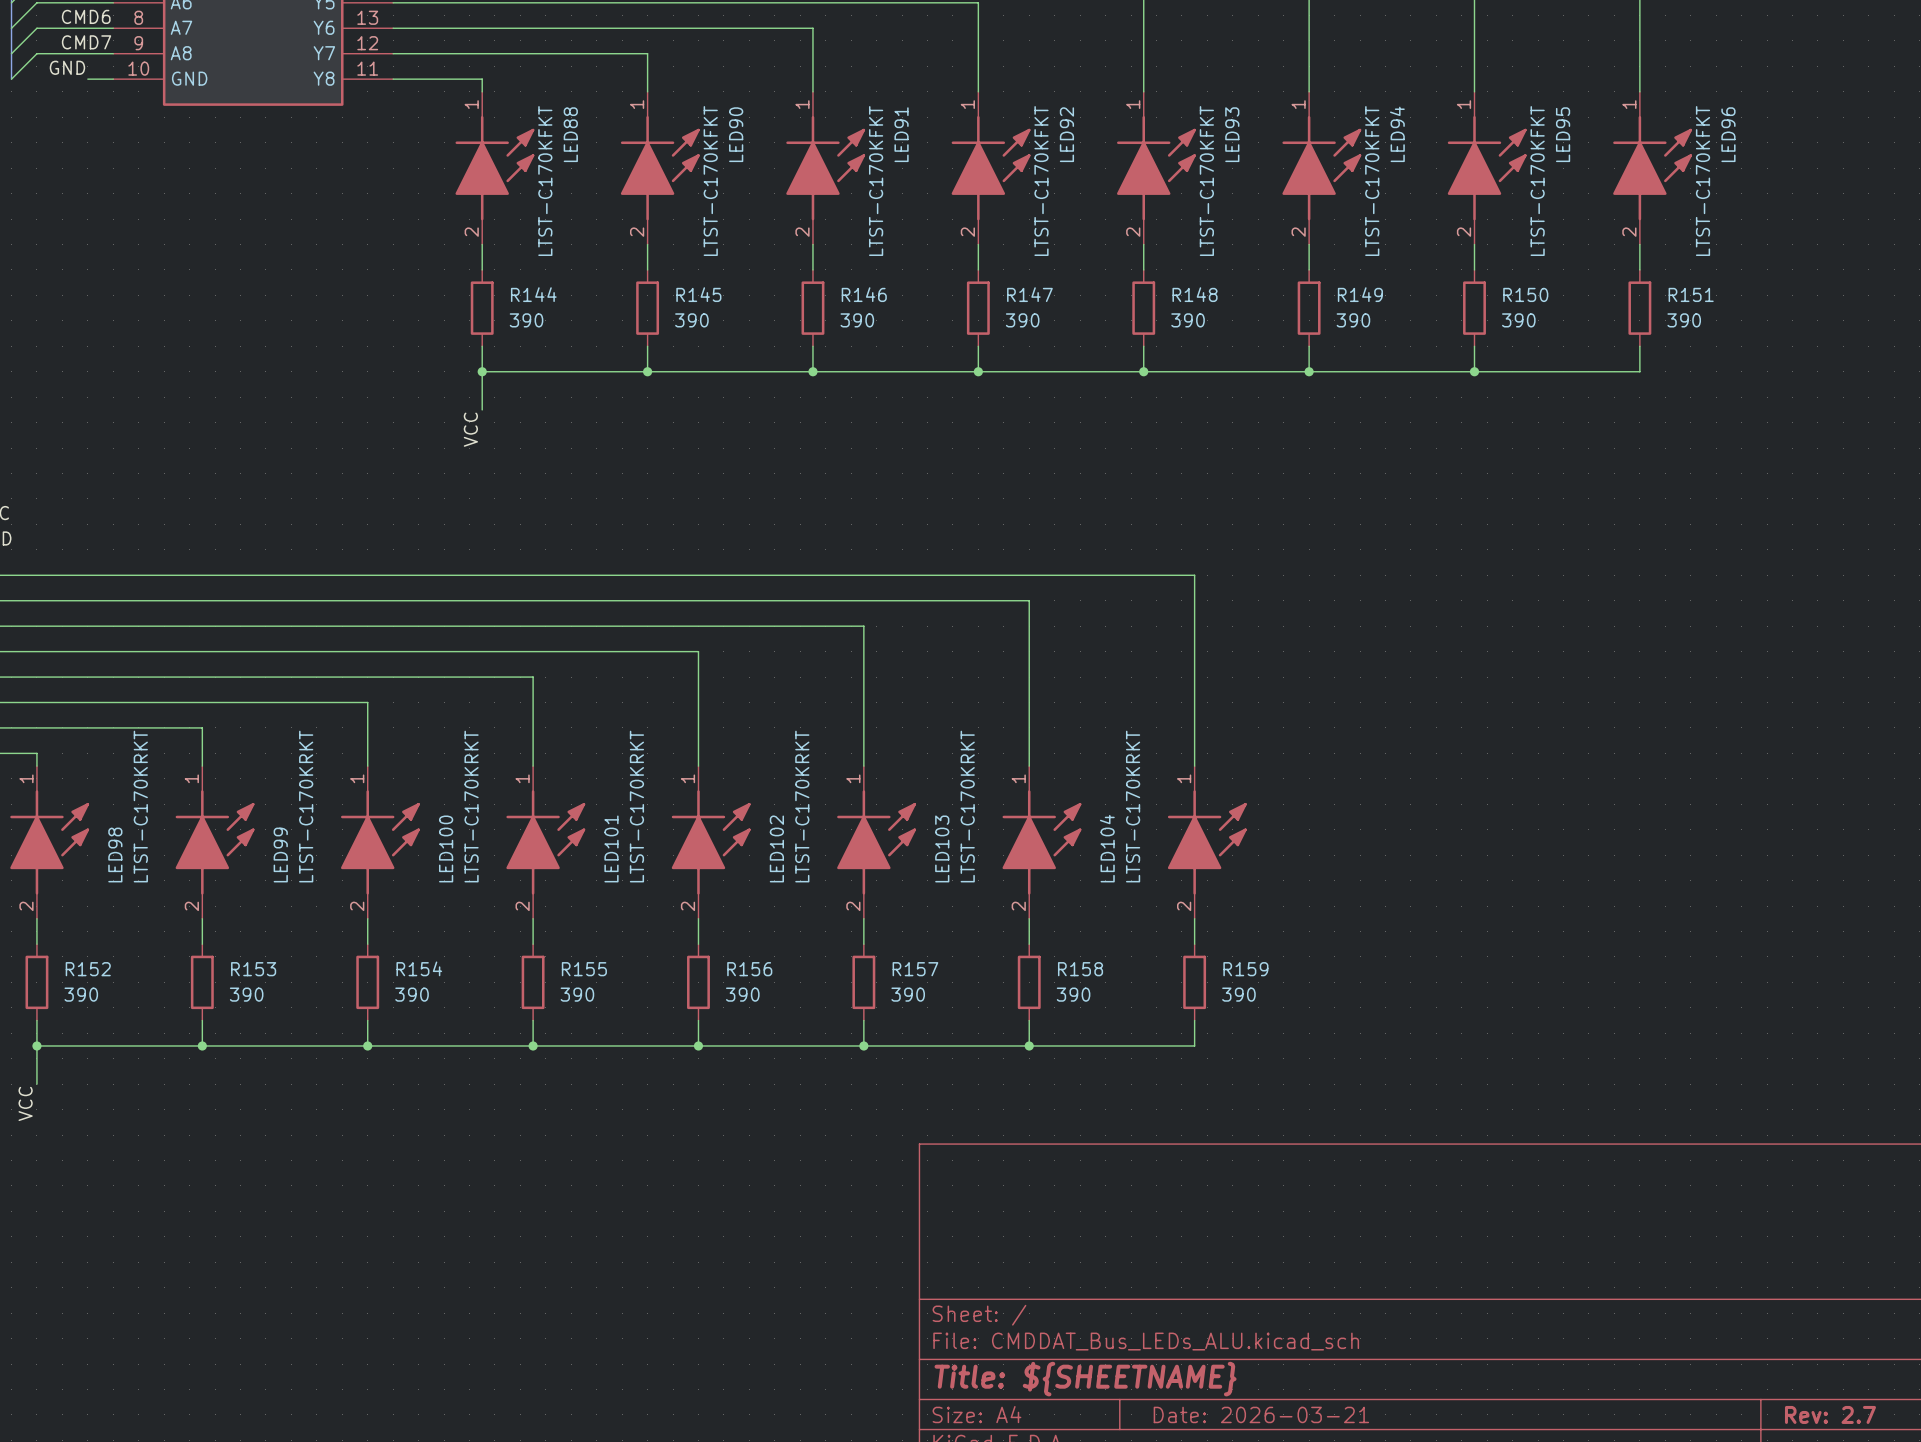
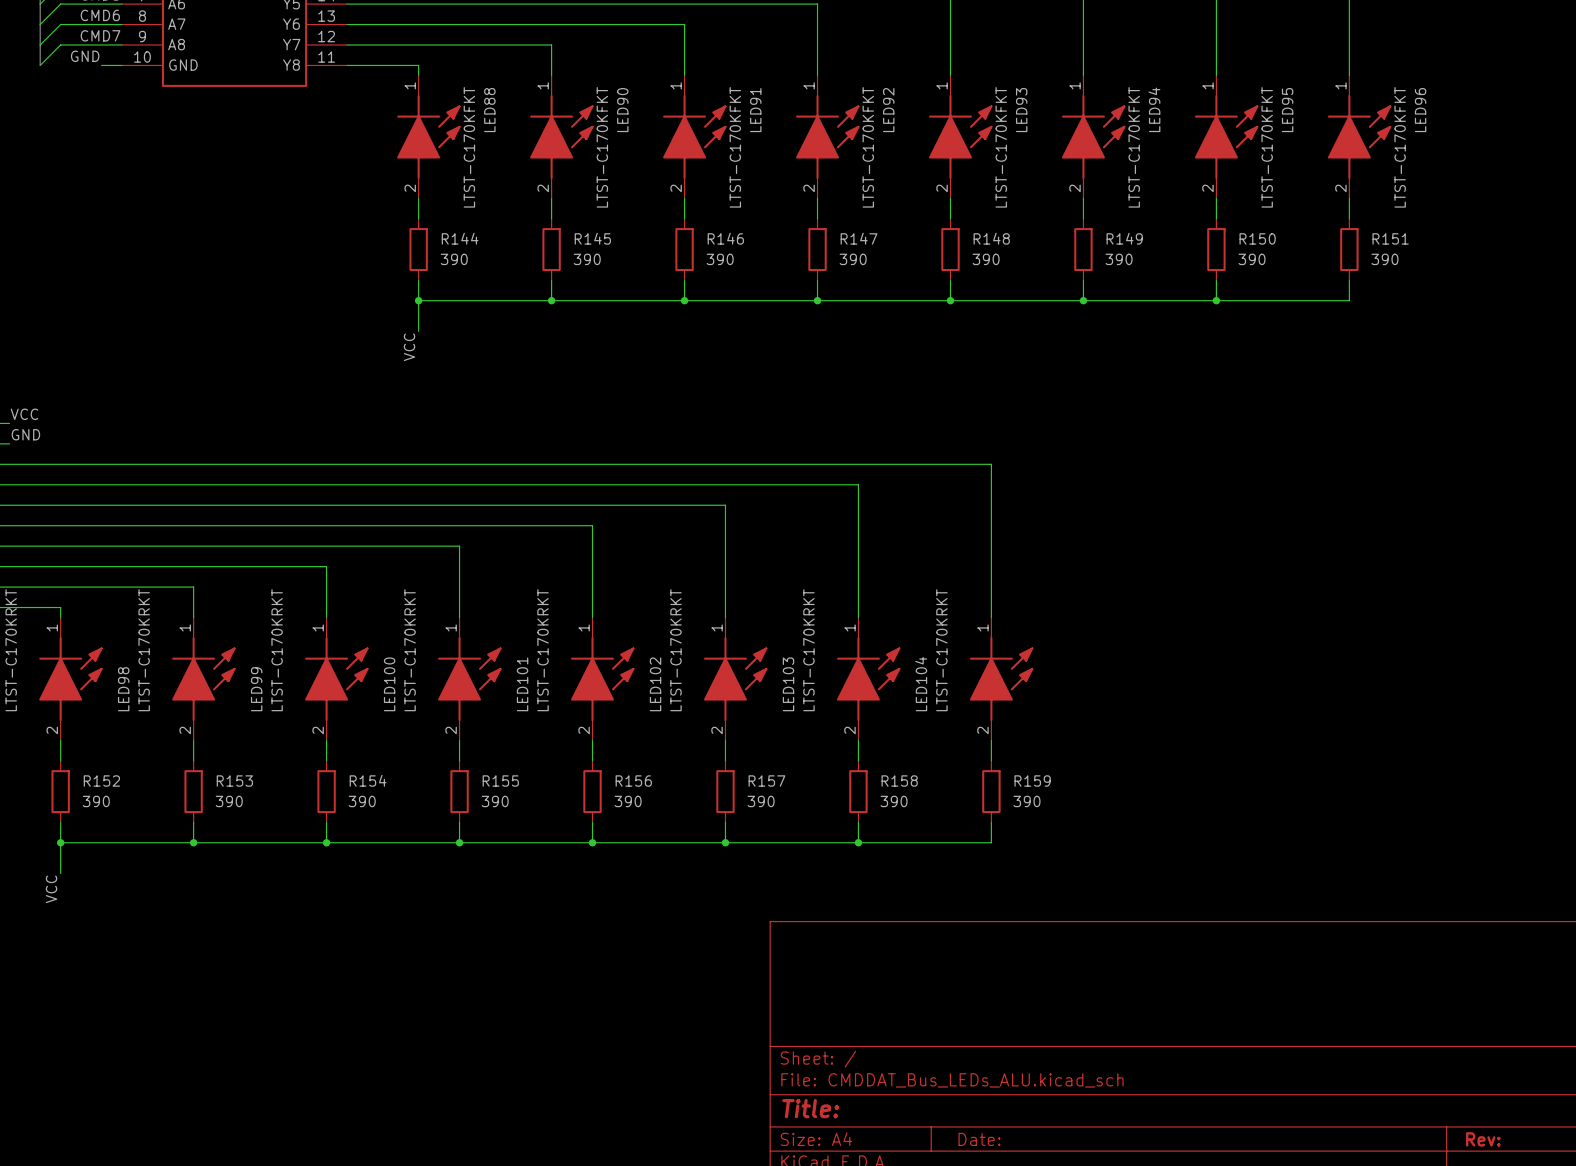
title block: Title: ${SHEETNAME} (1085, 1379) -> Title: (810, 1108)
title block: Date: 2026-03-21 (1261, 1414) -> Date: (979, 1139)
title block: Rev: 2.7 (1830, 1414) -> Rev: (1483, 1139)

